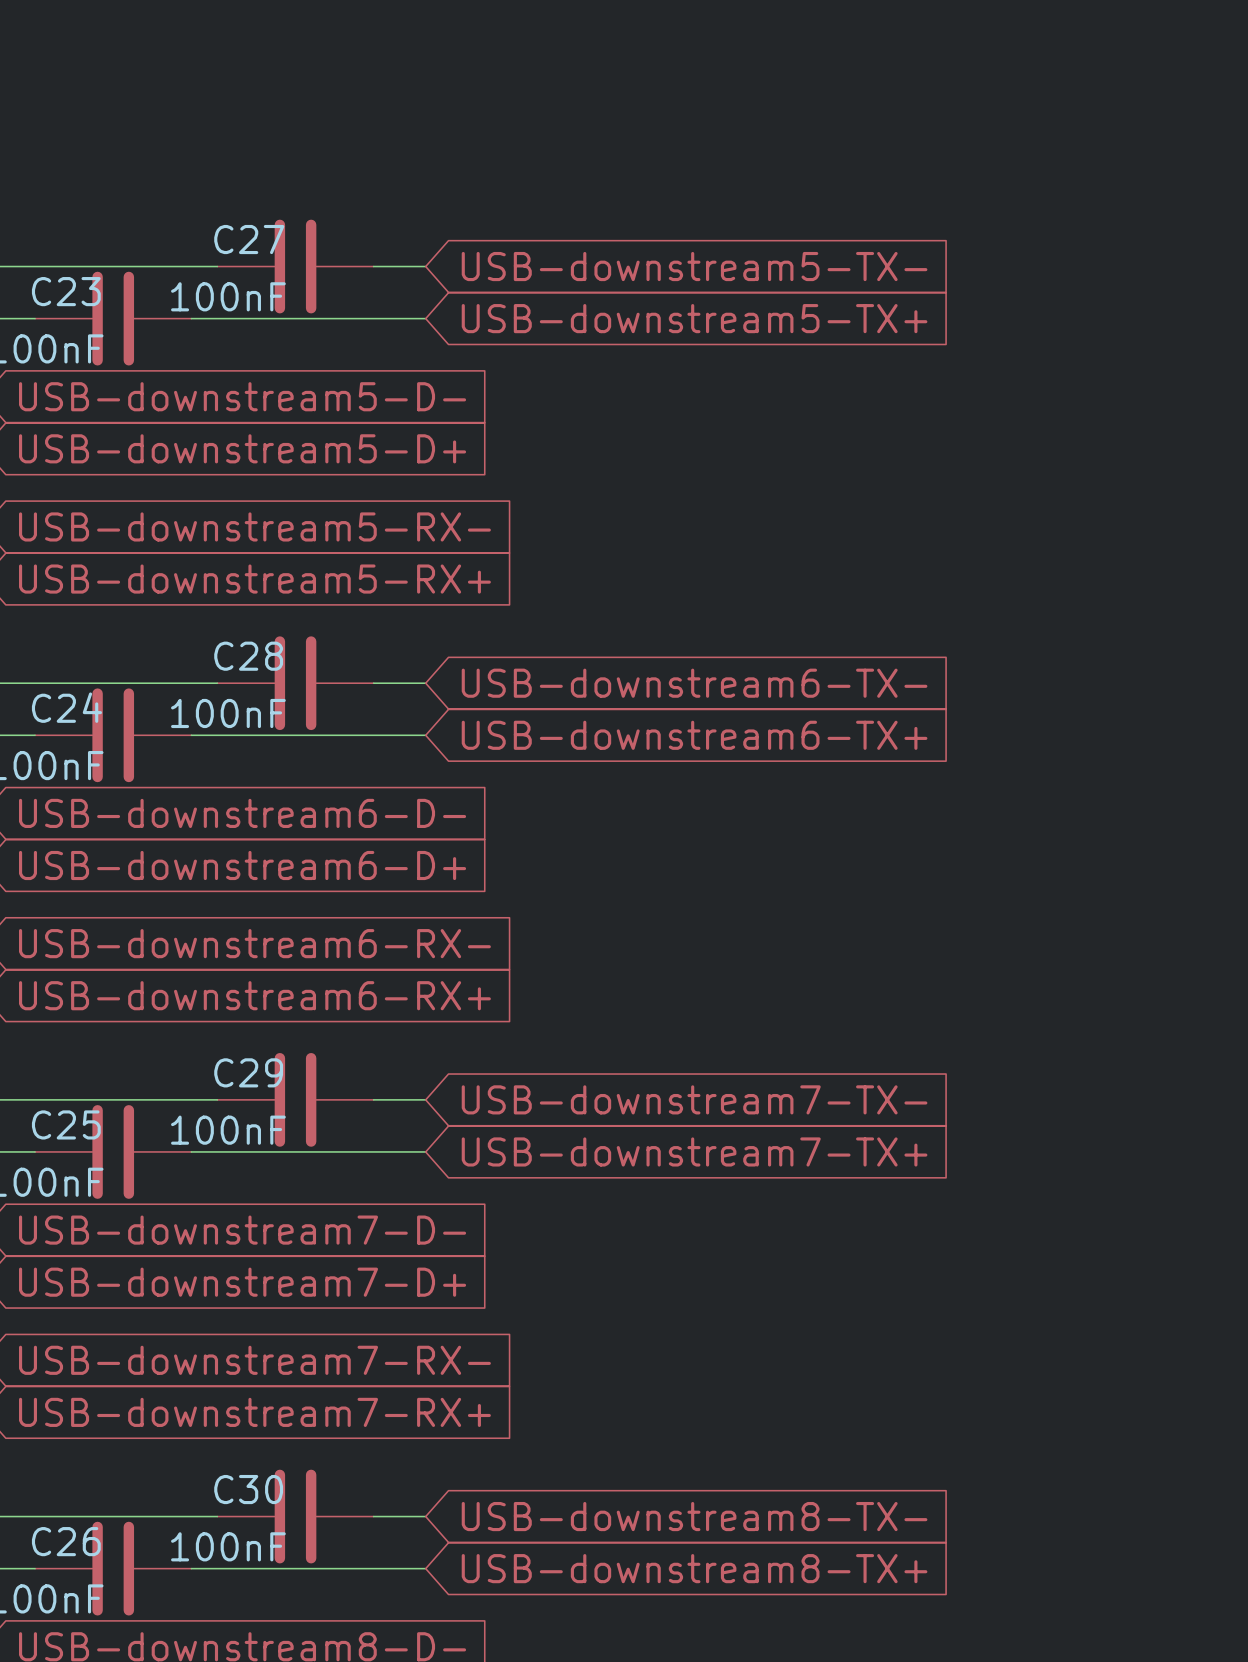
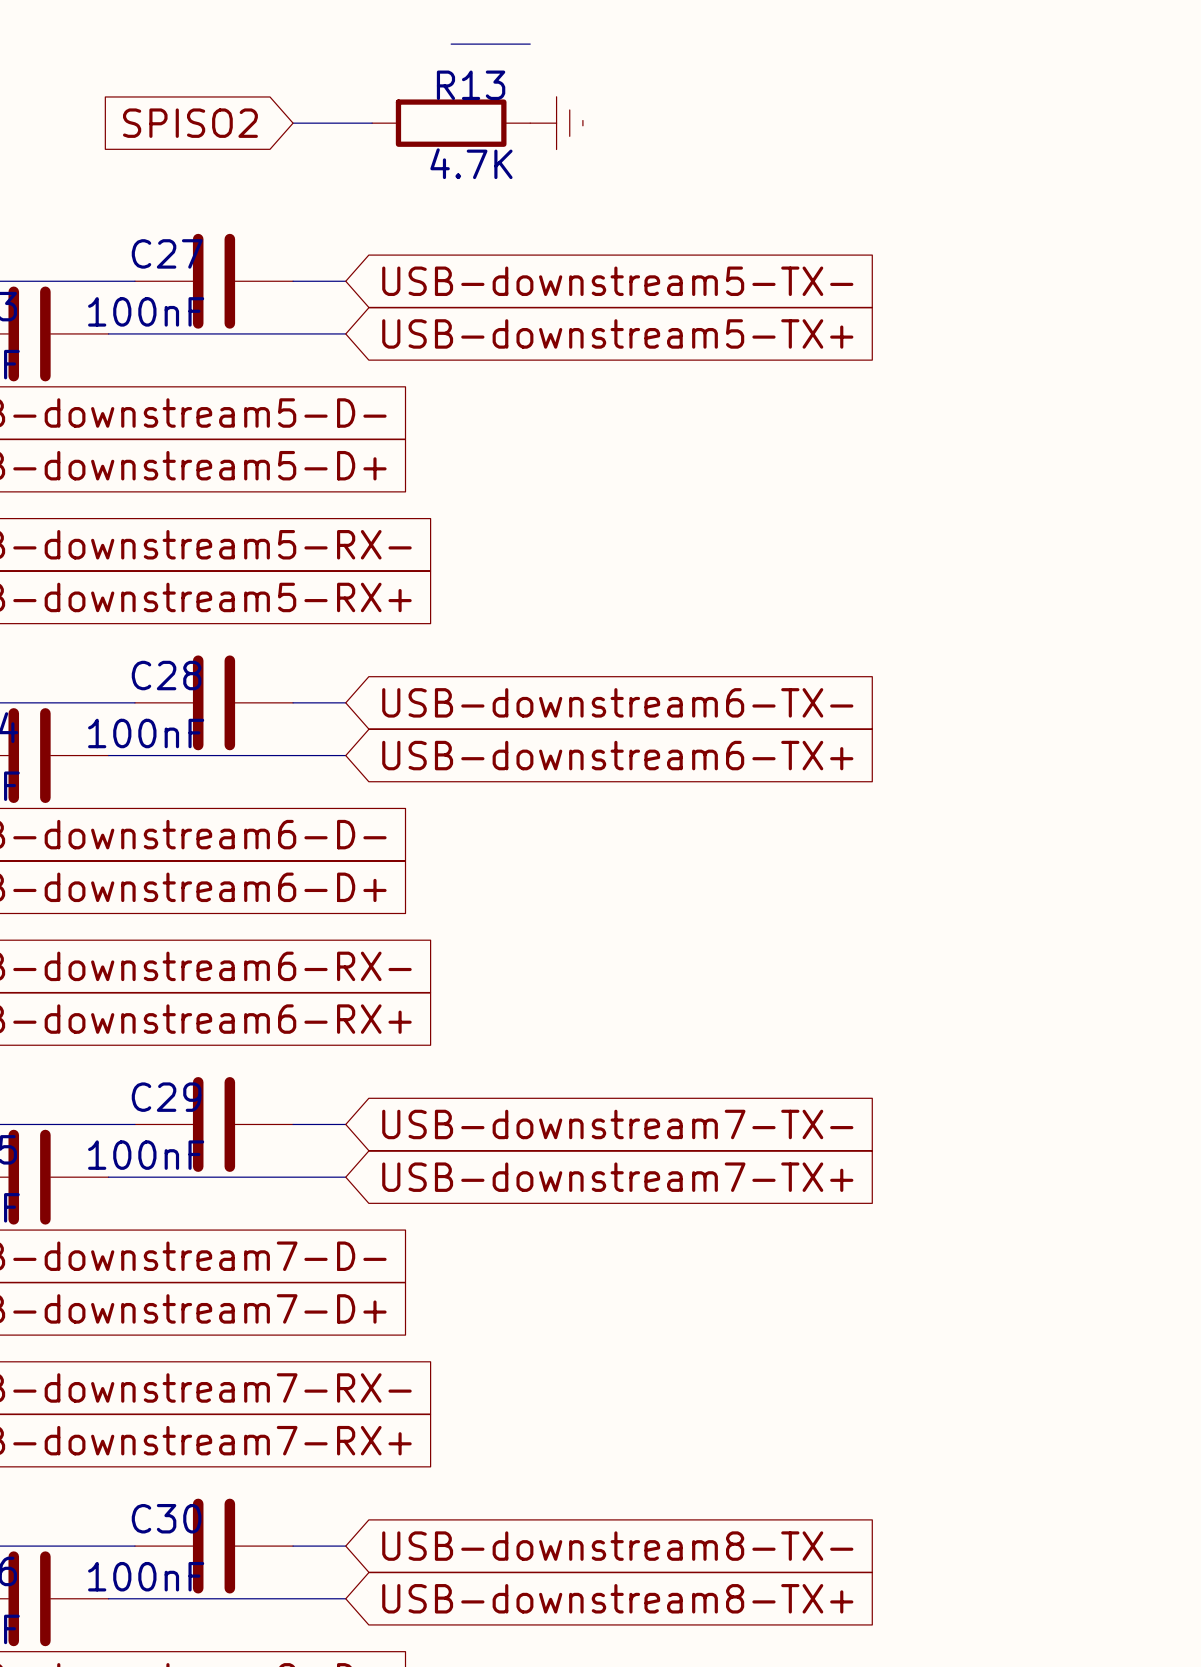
wire: none -> (451, 44) (530, 44)
global label: none -> SPISO2 (190, 123)
wire: none -> (293, 123) (372, 123)
R13: none -> 4.7K (451, 123)
power symbol: none -> (556, 123)

